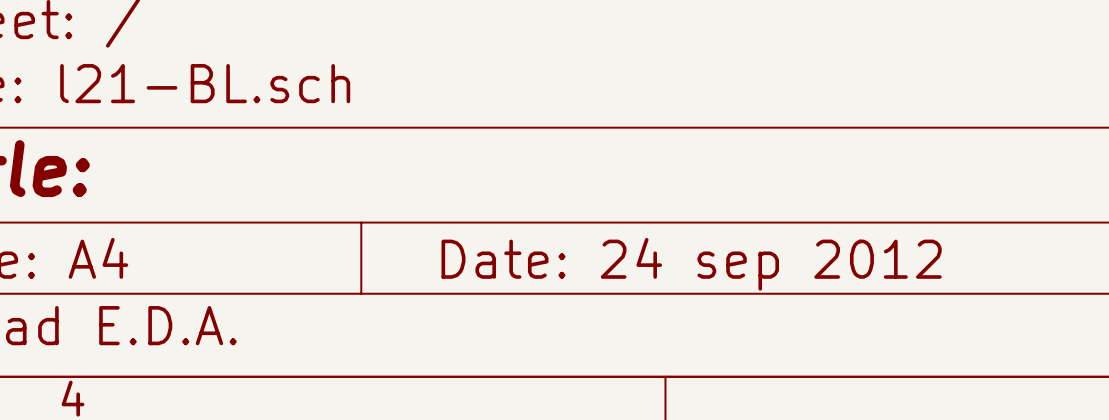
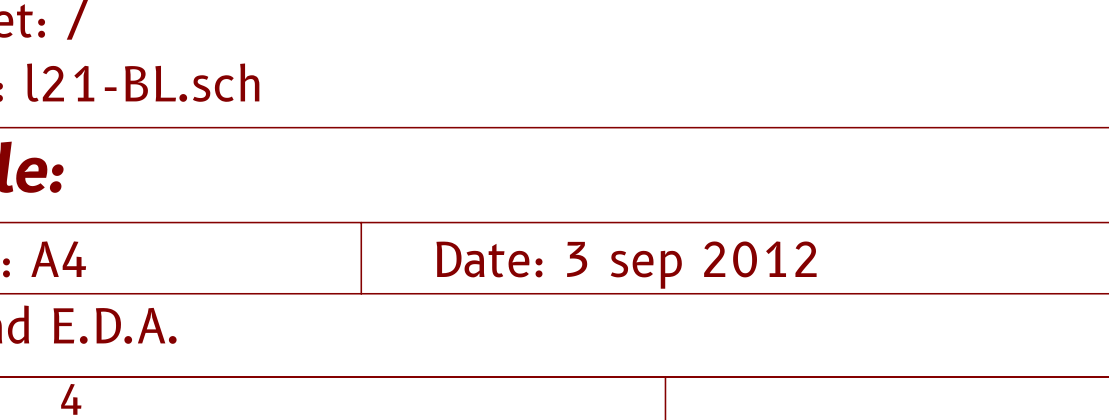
title block: Date: 24 sep 2012 (691, 264) -> Date: 3 sep 2012 (626, 265)

